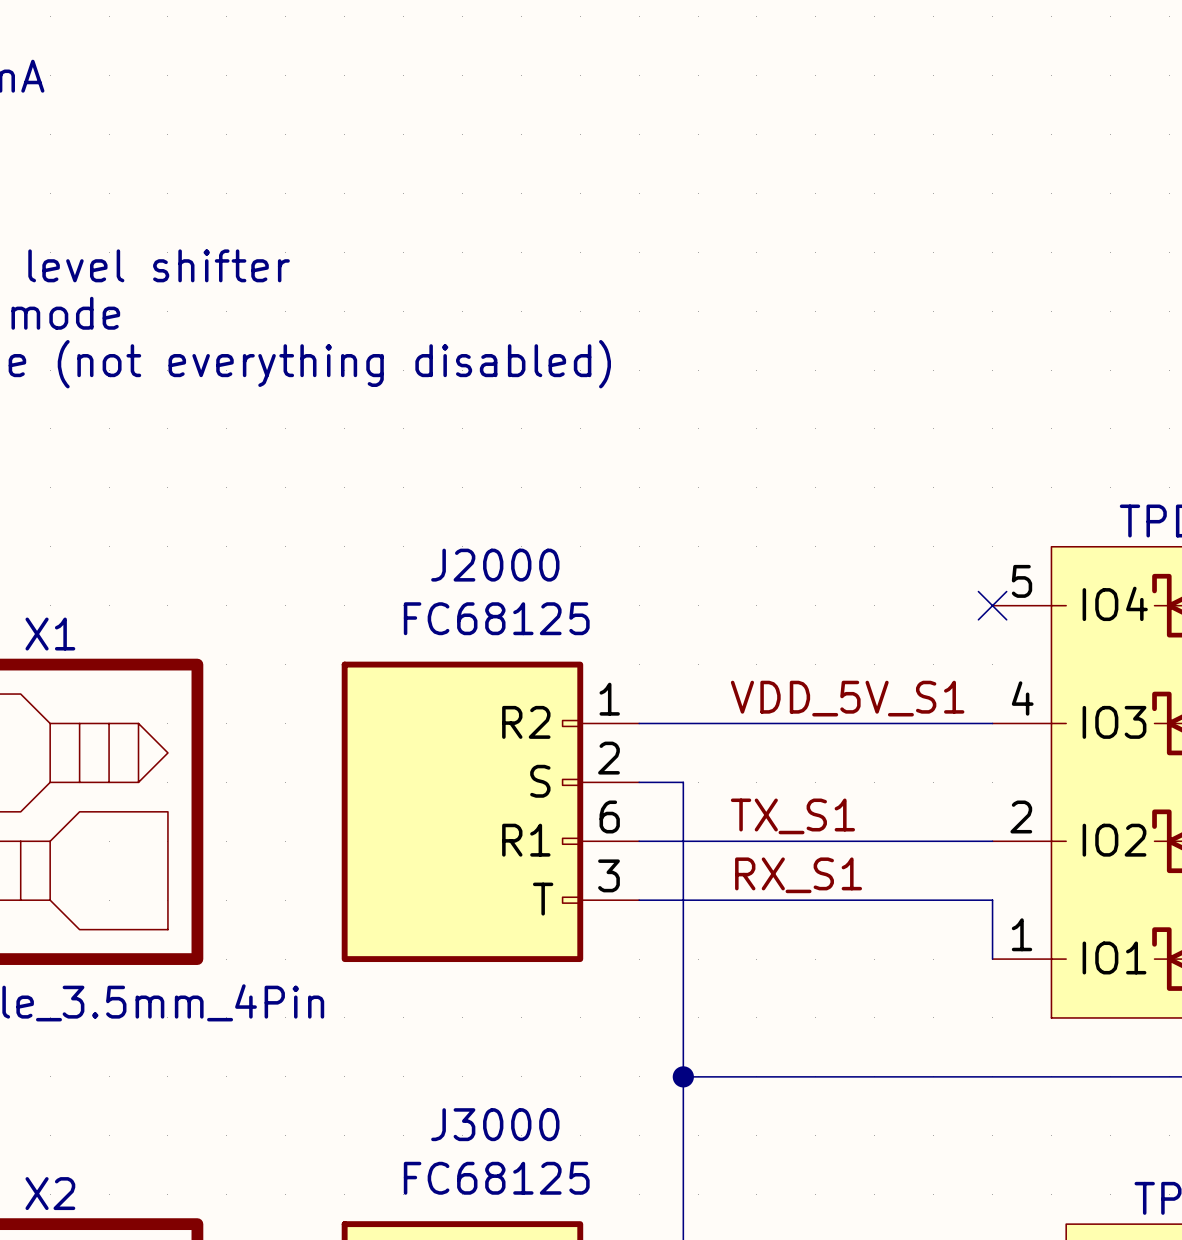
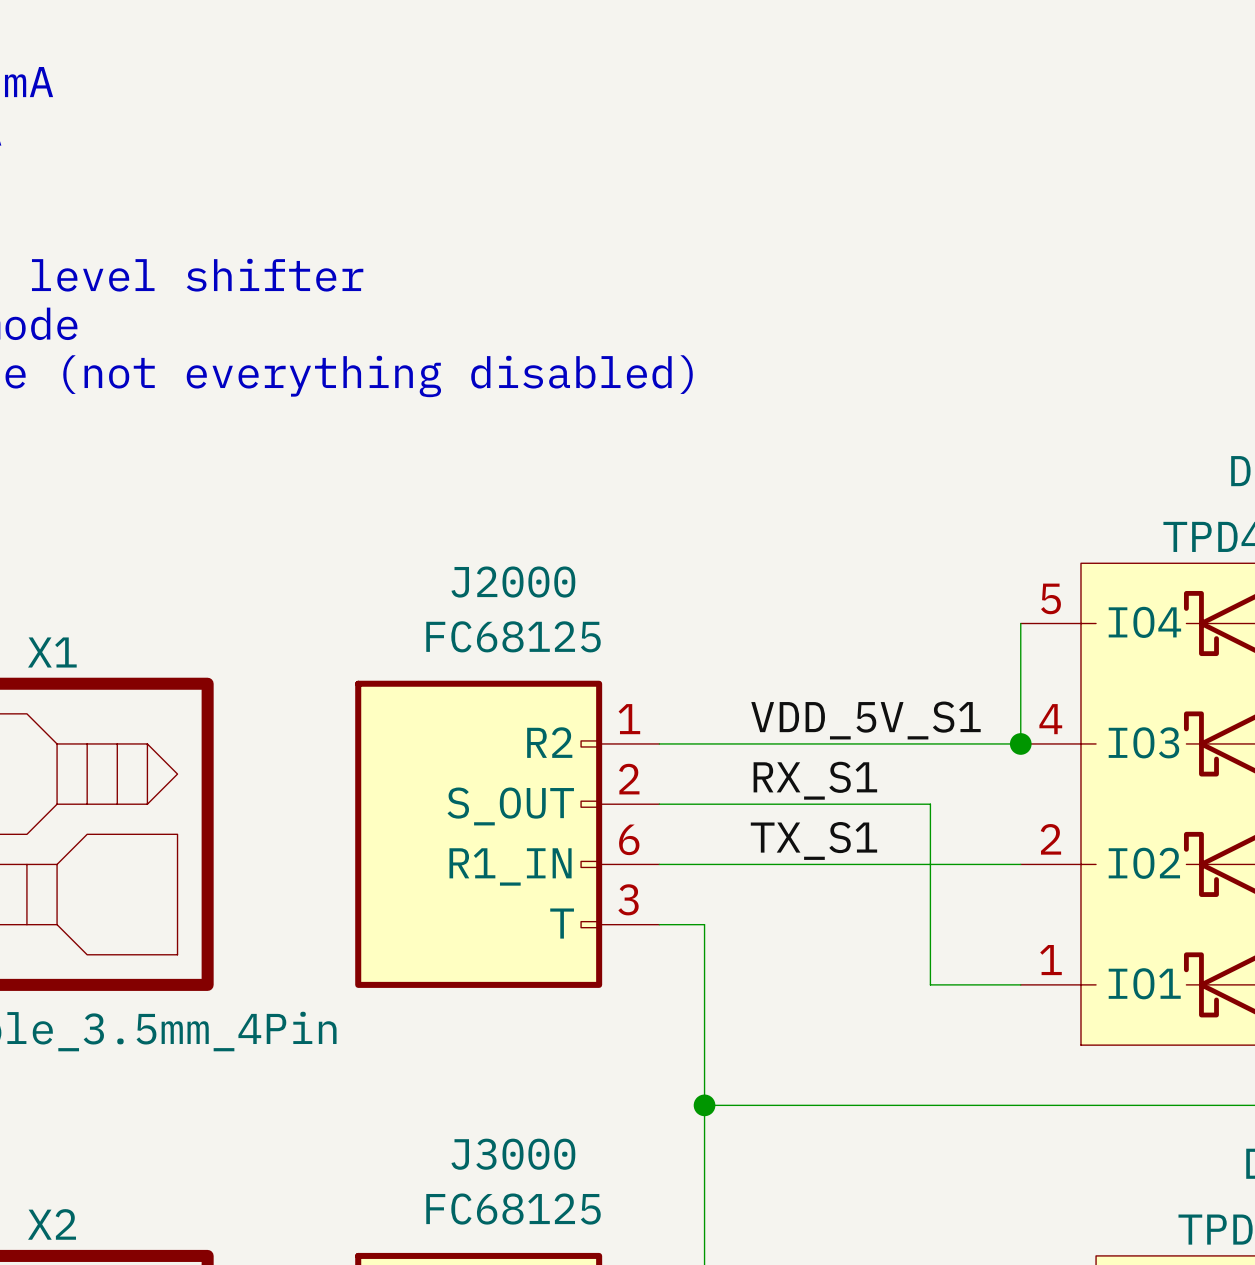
wire: none -> (1020, 623) (1020, 743)
no-connect mark: (992, 605) -> none
junction: none -> (1020, 743)
J2000 pin name: S (540, 781) -> S_OUT (510, 806)
wire: (683, 782) (683, 900) (992, 900) (992, 959) -> (704, 804) (930, 804) (930, 984) (1020, 984)
J2000 pin name: R1 (526, 840) -> R1_IN (510, 866)
label position: RX_S1 (798, 875) -> RX_S1 (815, 780)

